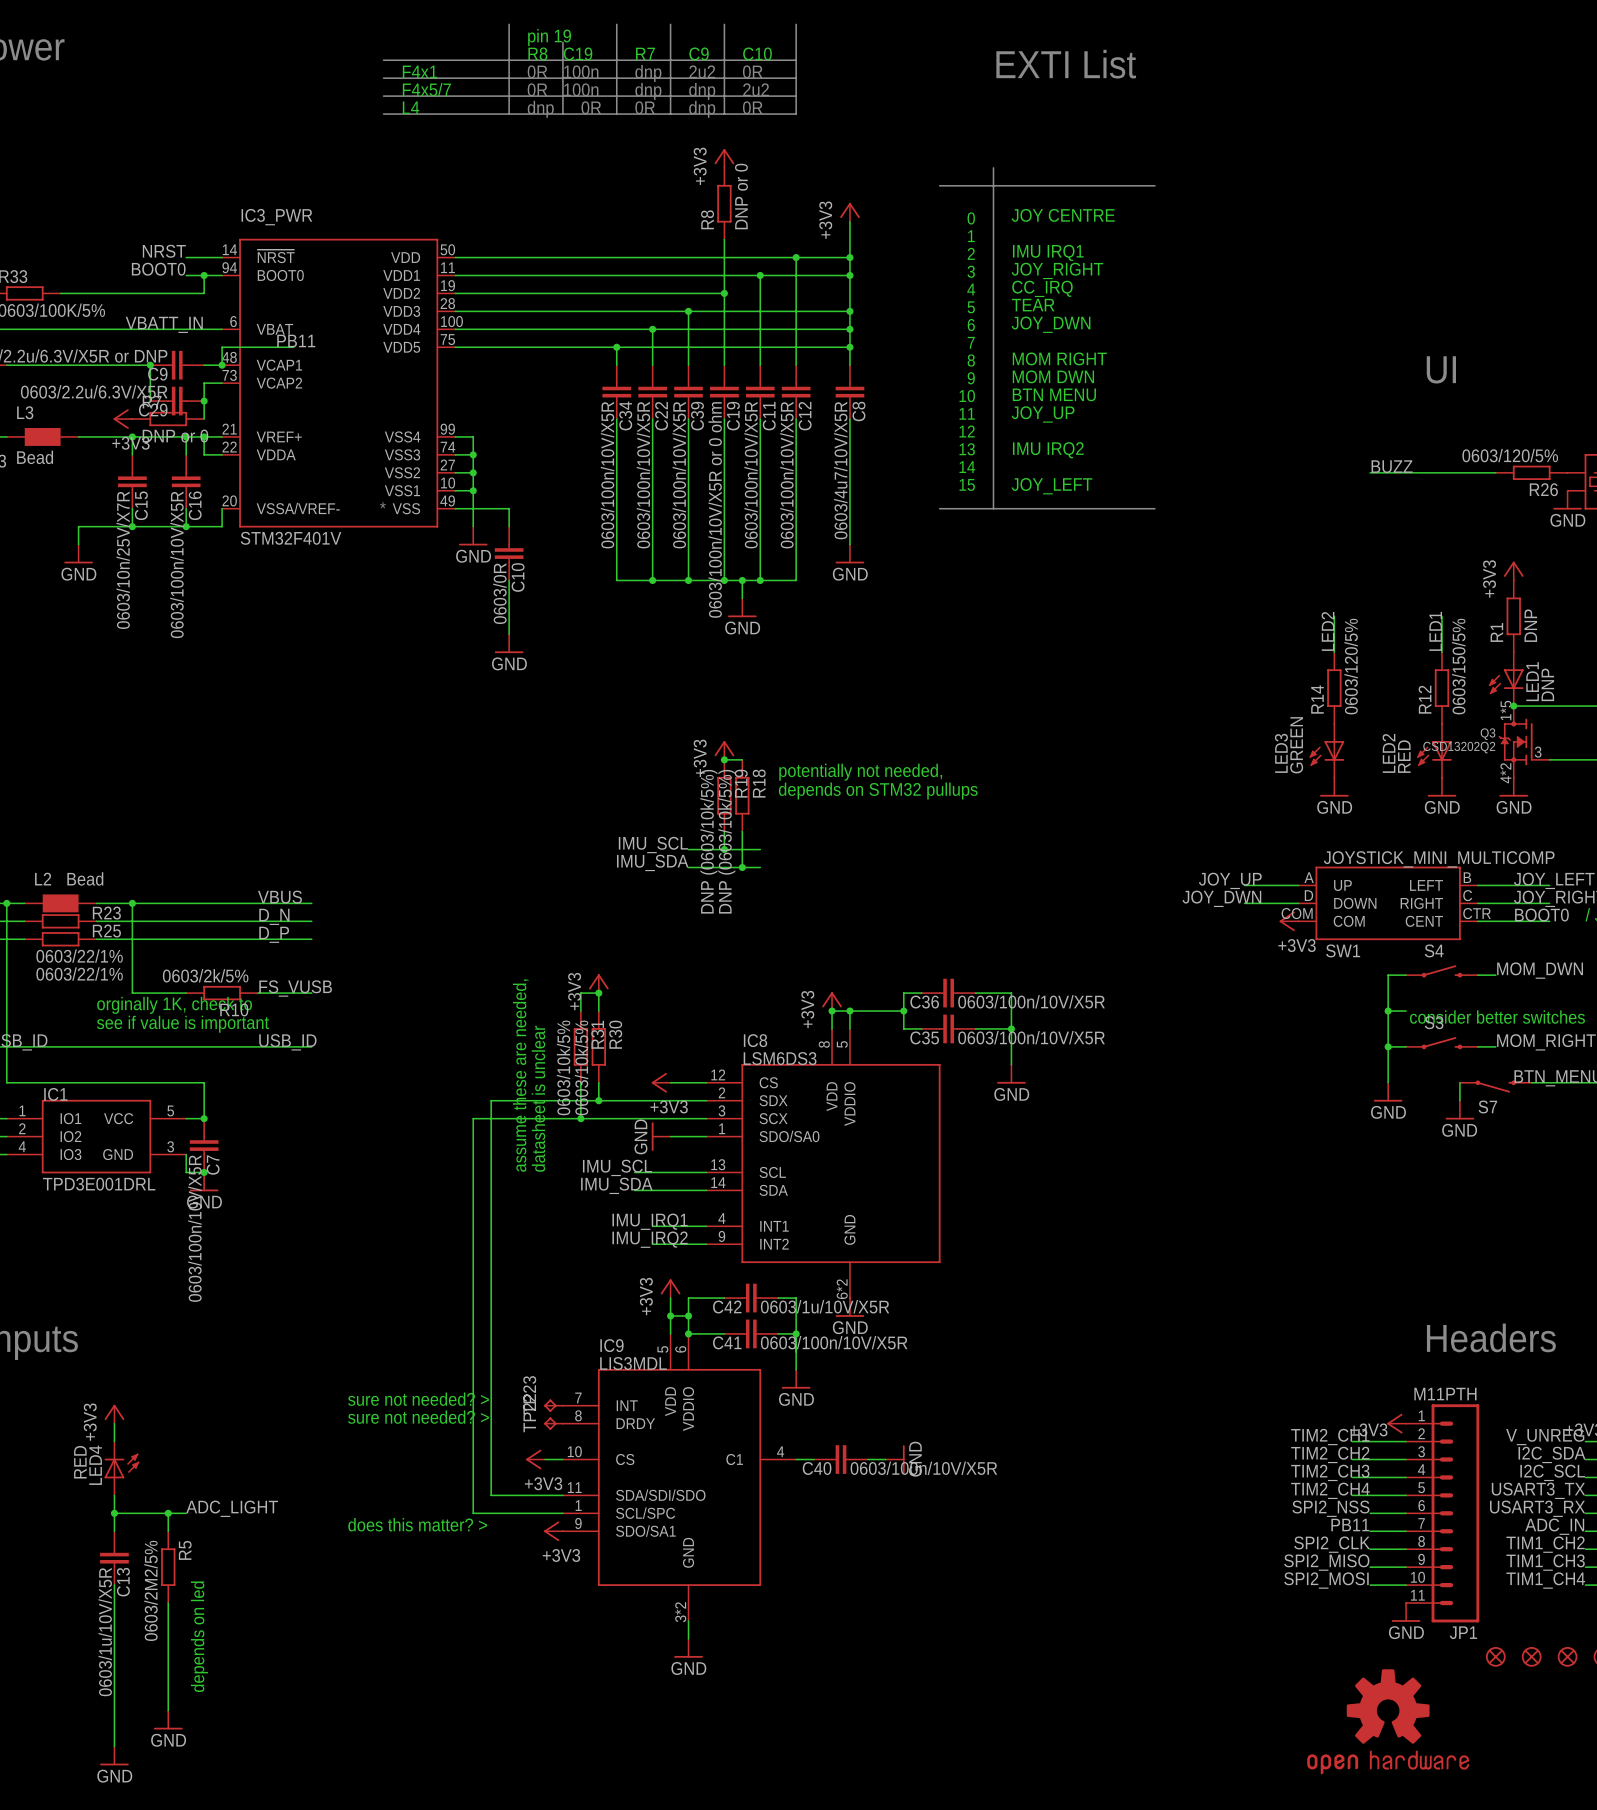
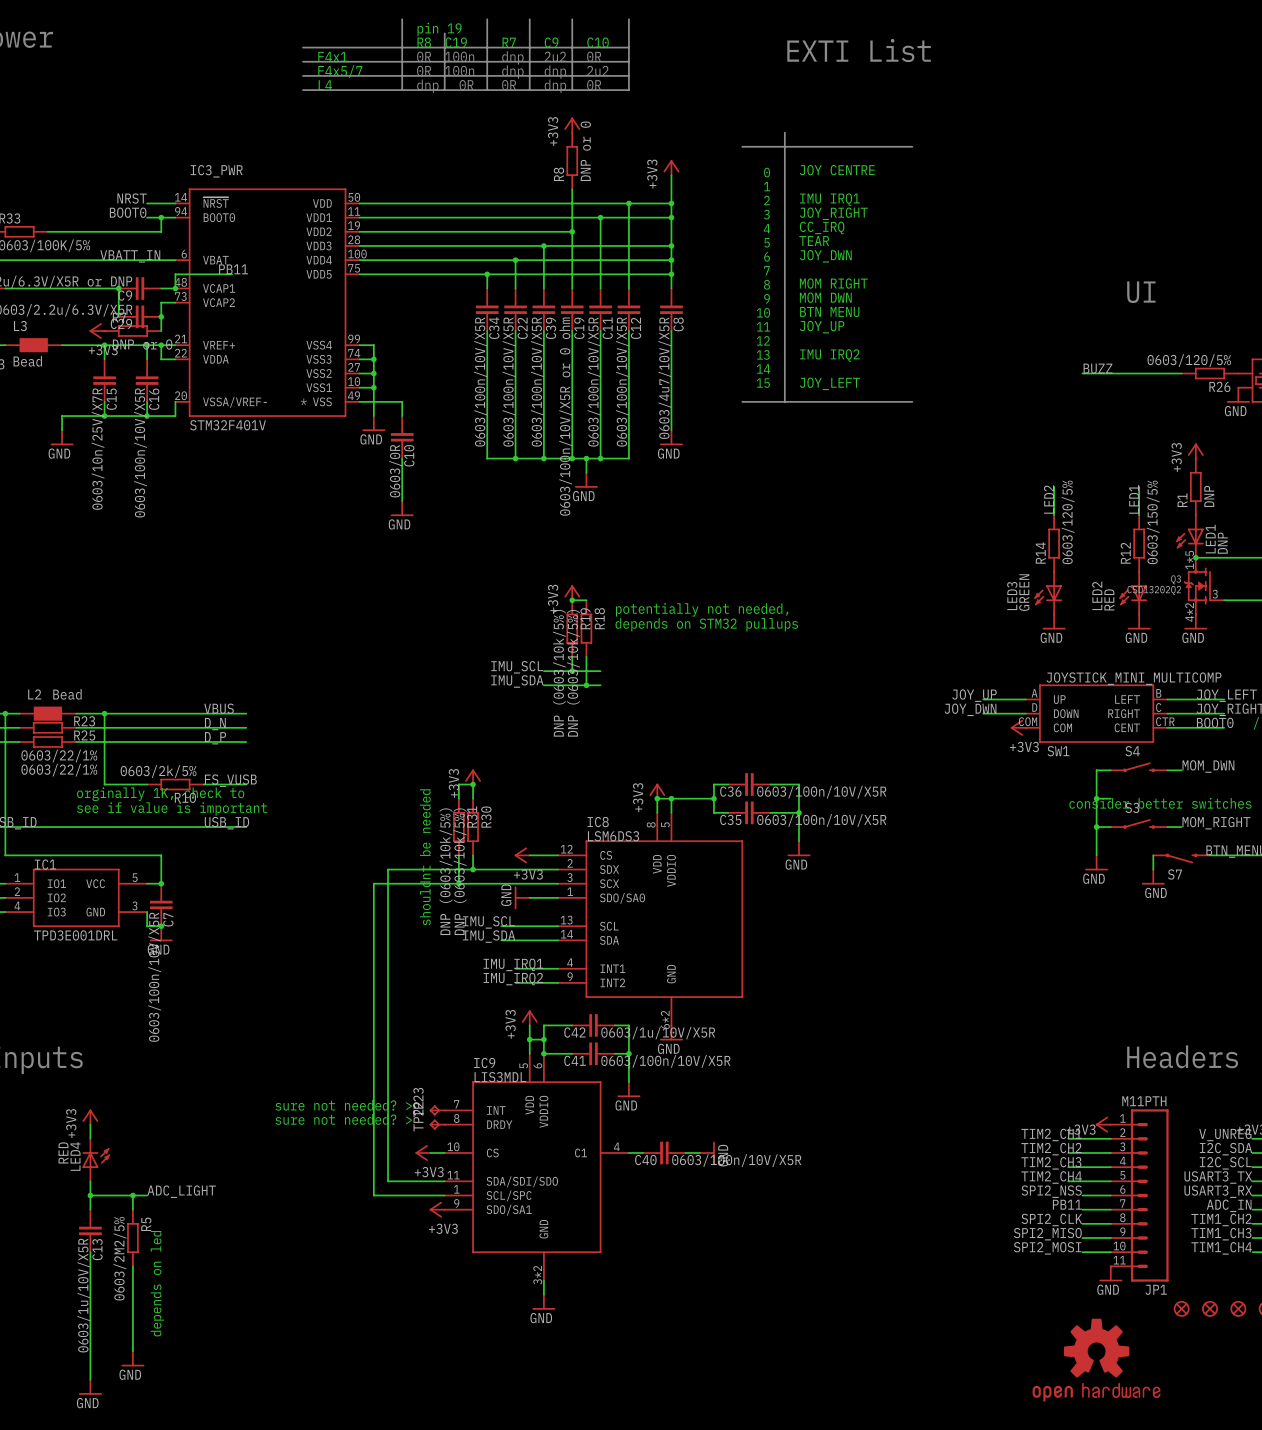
R31 value: 0603/10k/5% (563, 1067) -> DNP (0603/10k/5%) (445, 871)
R30 value: 0603/10k/5% (581, 1067) -> DNP (0603/10k/5%) (460, 871)
text: assume these are needed, (520, 1075) -> none
text: datasheet is unclear (538, 1098) -> shouldnt be needed (425, 857)
text: does this matter? > (417, 1524) -> none

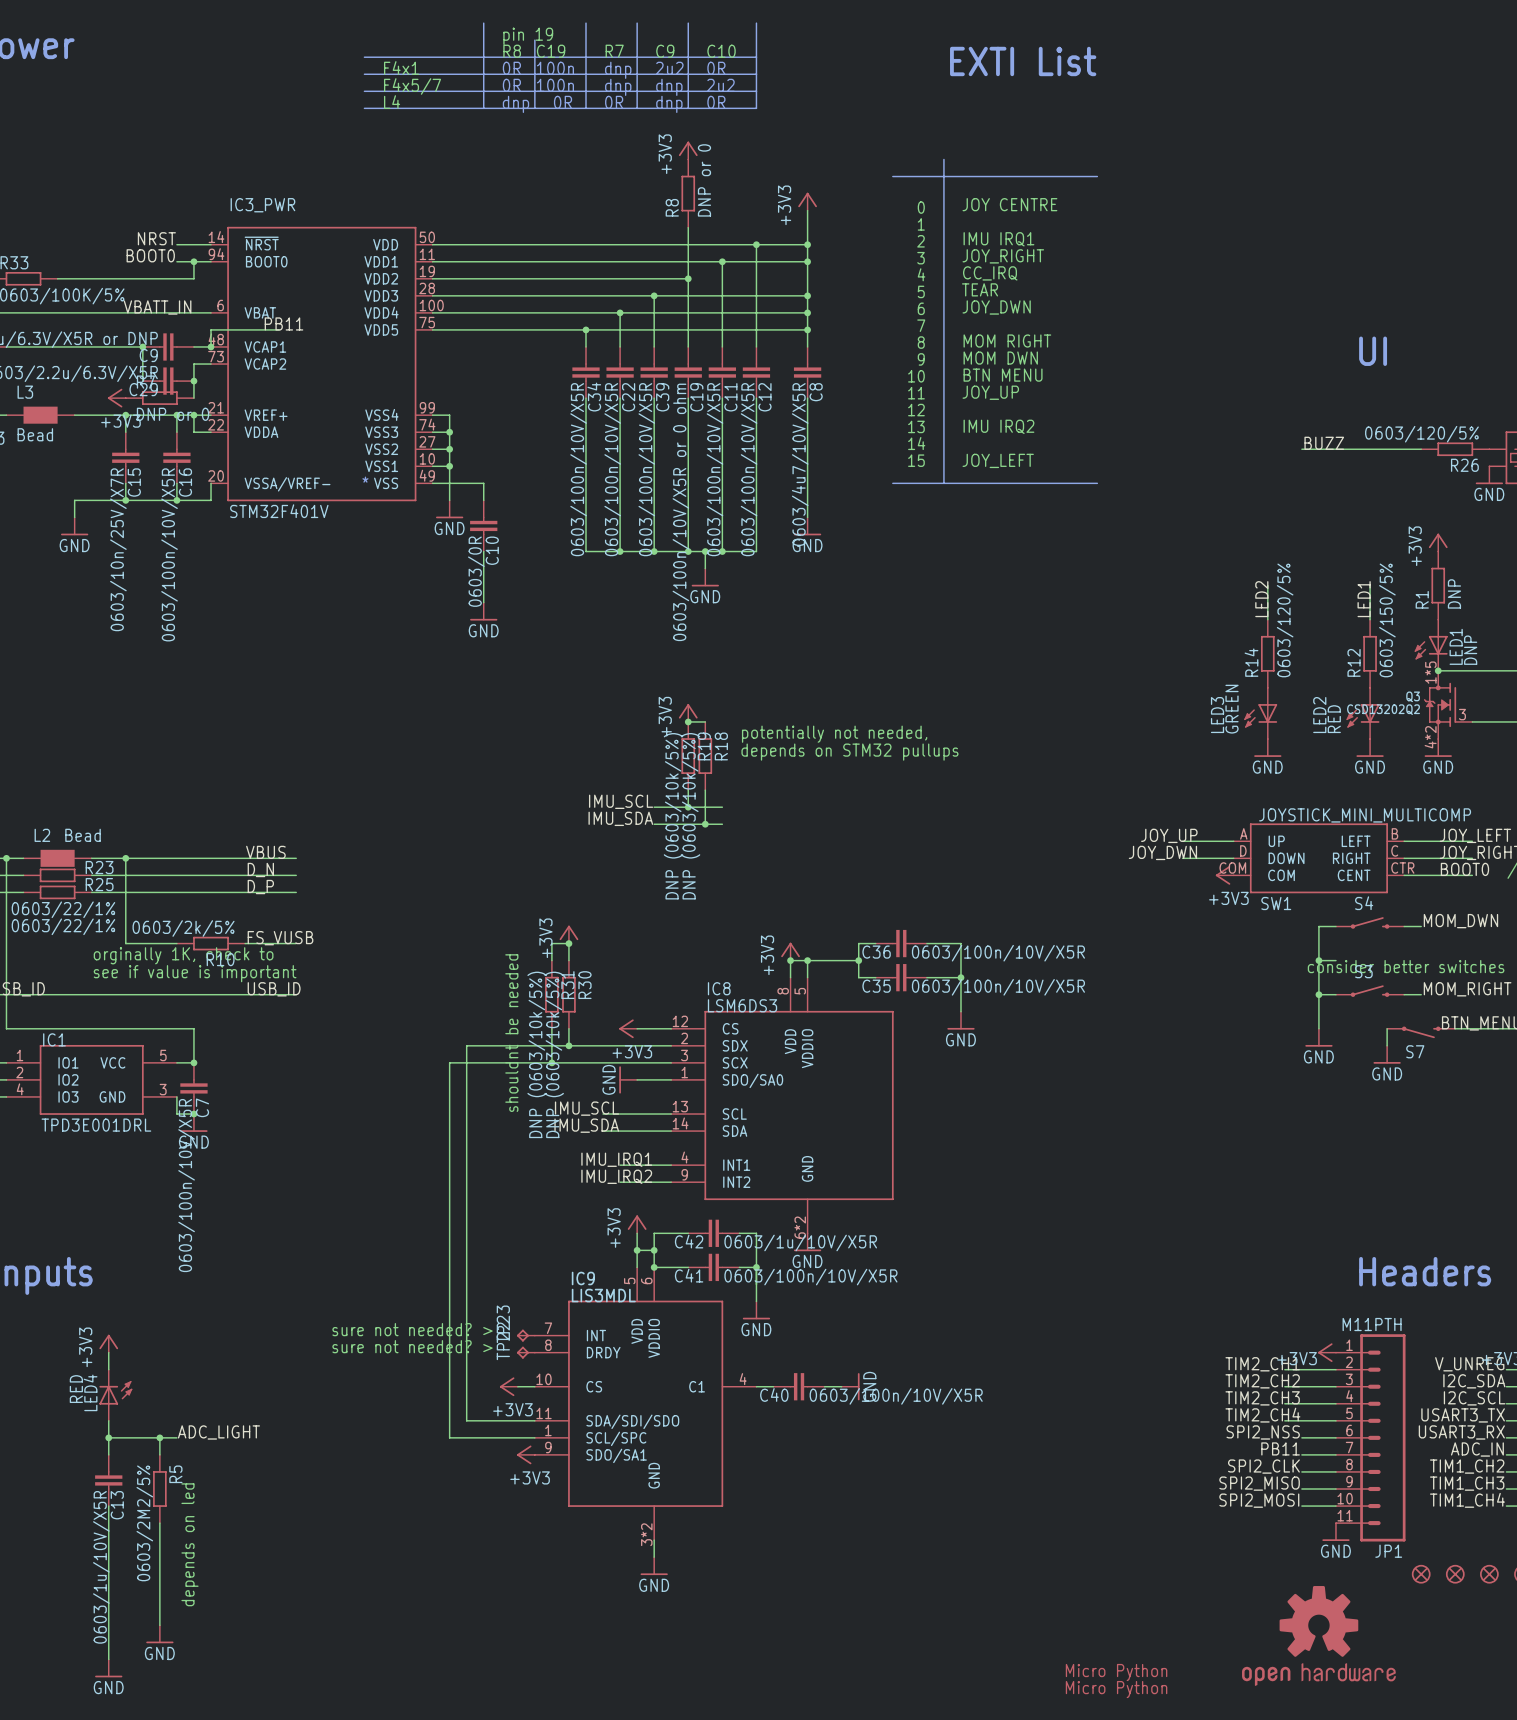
part: none -> (1116, 1672)
part: none -> (1116, 1689)

